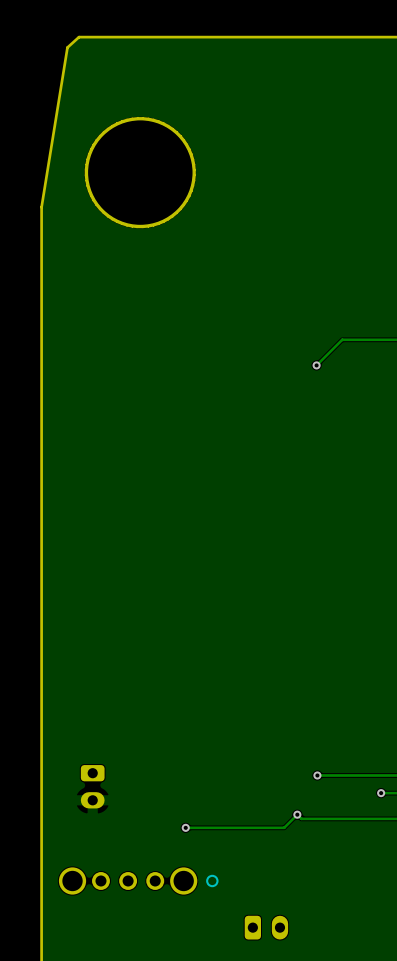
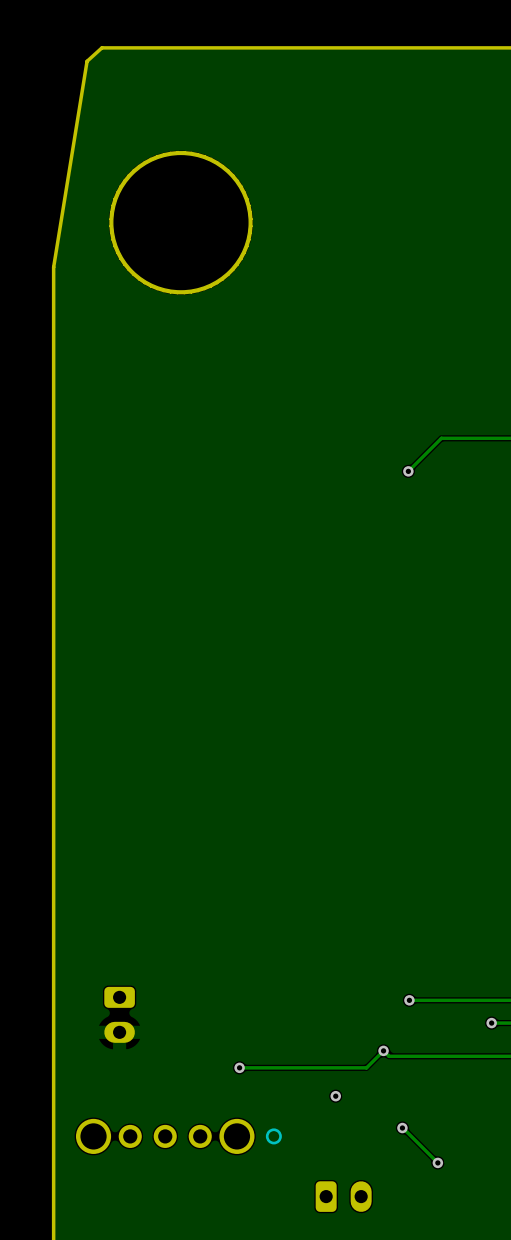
via: none -> (335, 1096)
track: none -> (402, 1128) (437, 1162)
via: none -> (402, 1128)
via: none -> (437, 1162)

